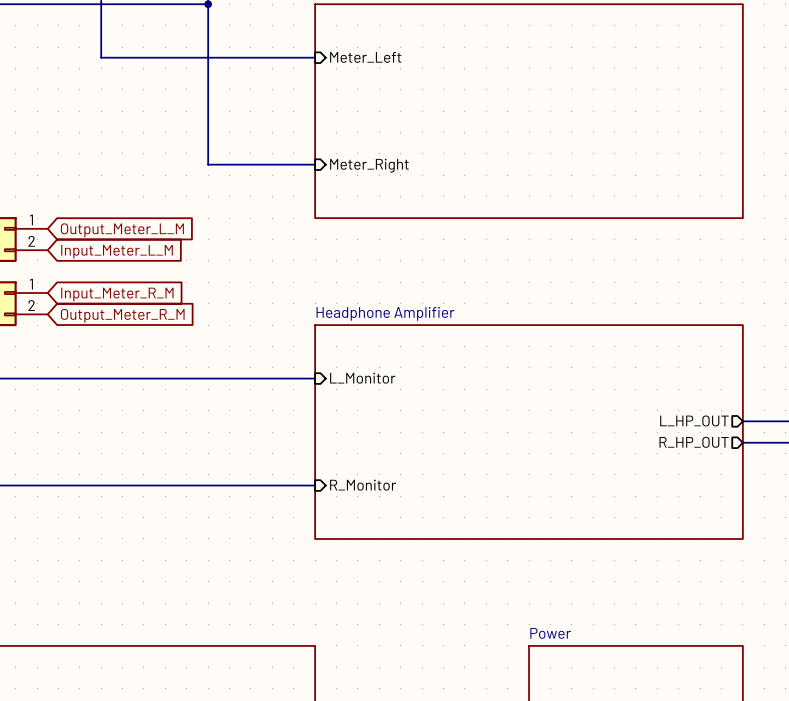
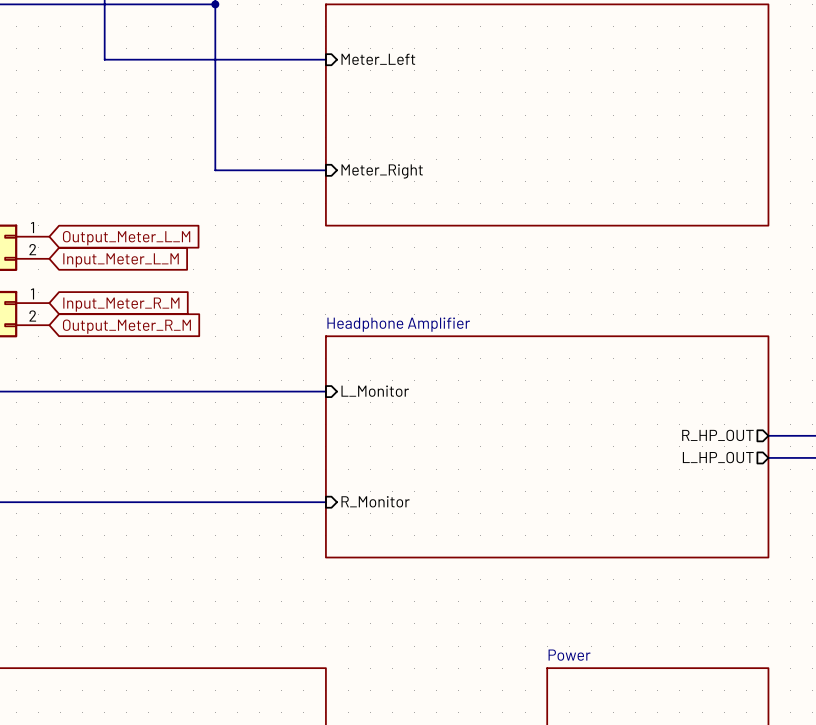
sheet pin: L_HP_OUT (694, 420) -> R_HP_OUT (717, 435)
sheet pin: R_HP_OUT (694, 442) -> L_HP_OUT (718, 457)

